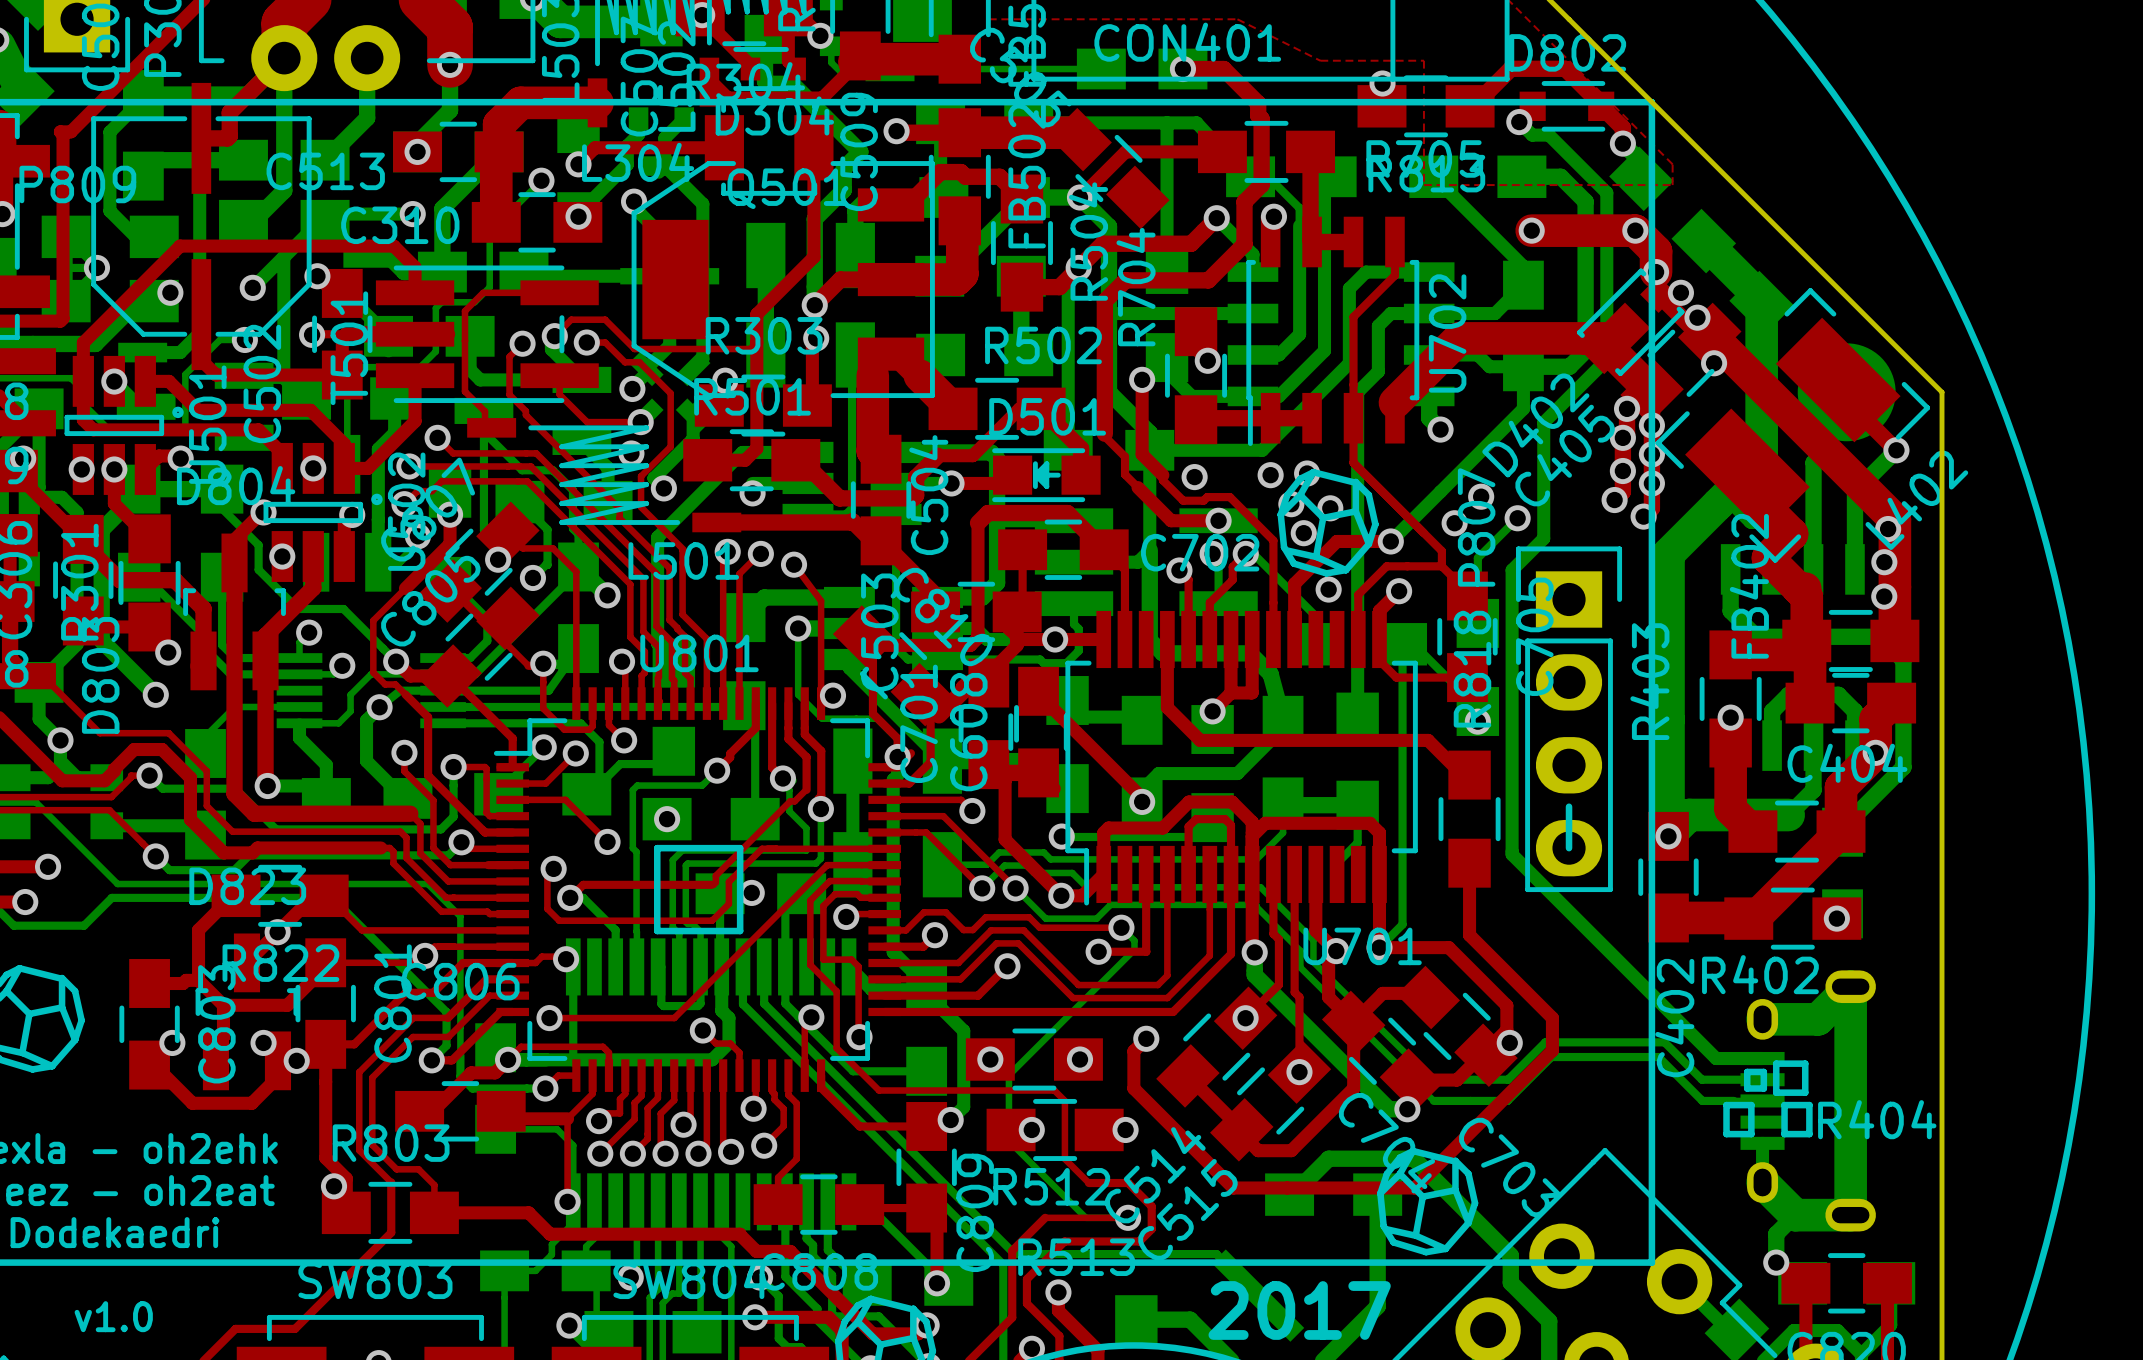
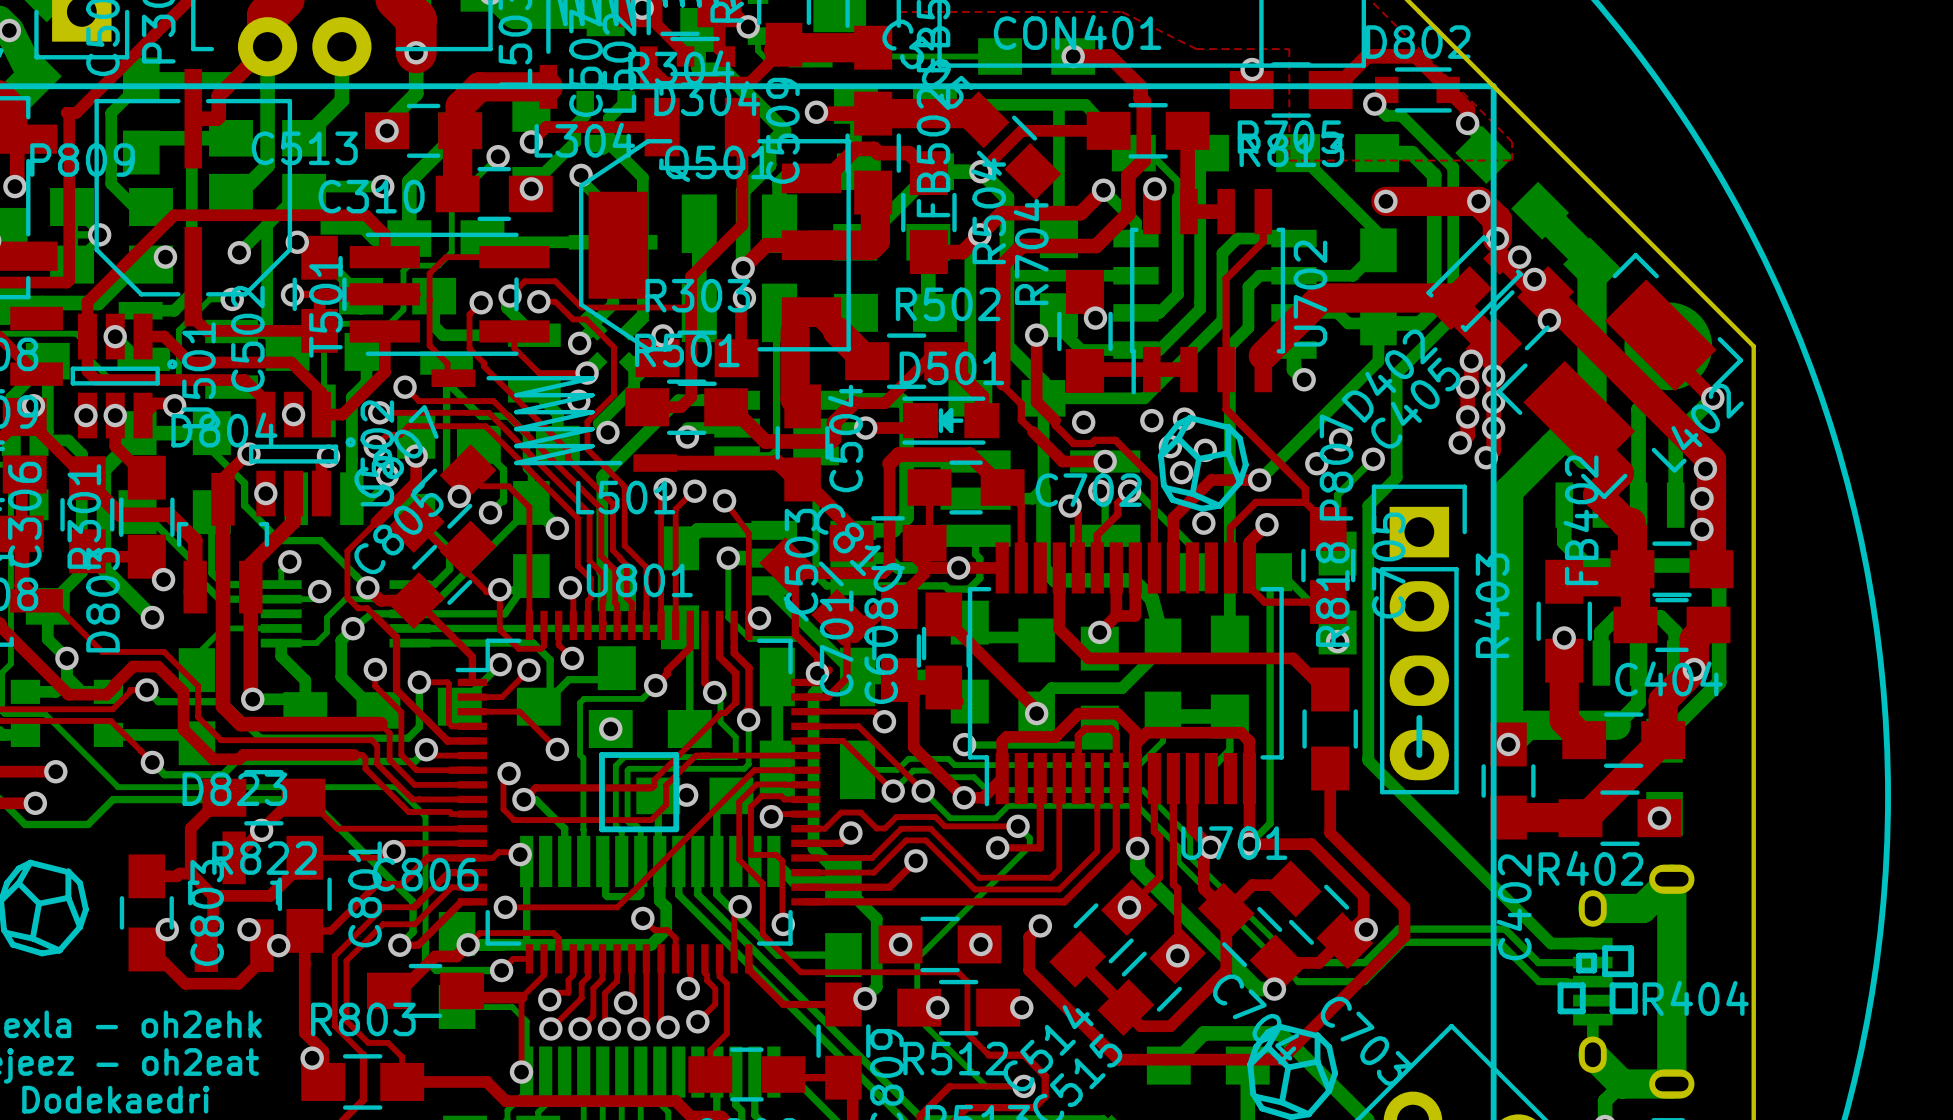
L402 name position: L402 (1916, 500) -> L402 (1697, 428)

